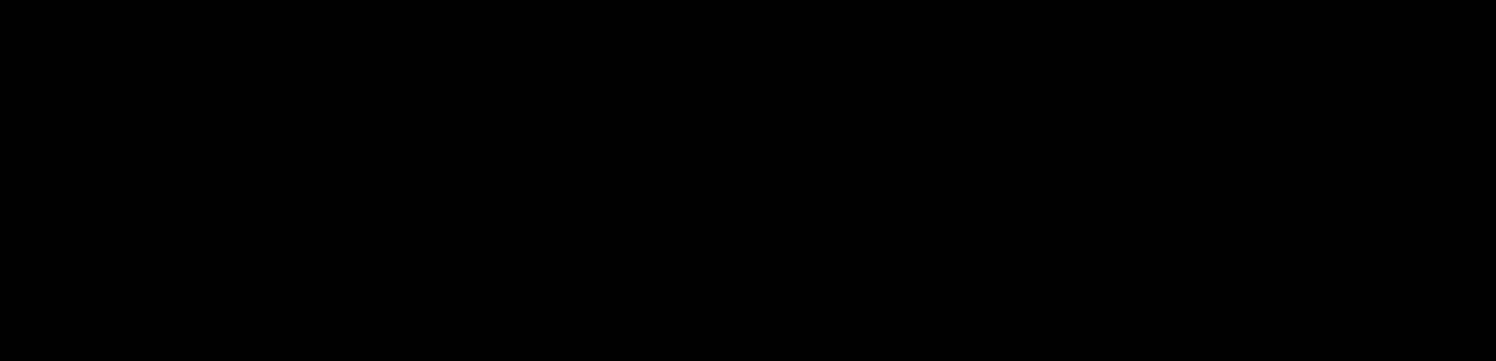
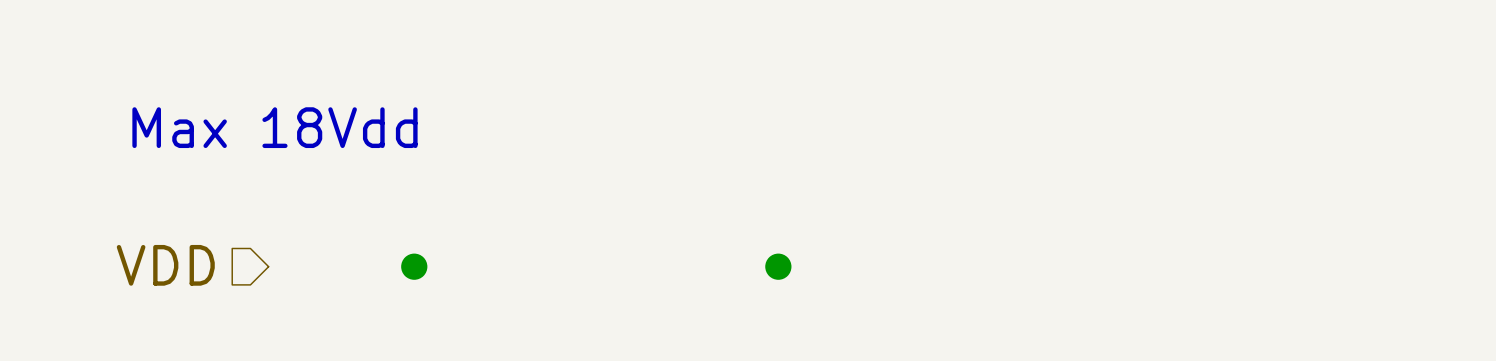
text: none -> Max 18Vdd (274, 127)
hierarchical label: none -> VDD (165, 265)
junction: none -> (414, 266)
junction: none -> (778, 266)

